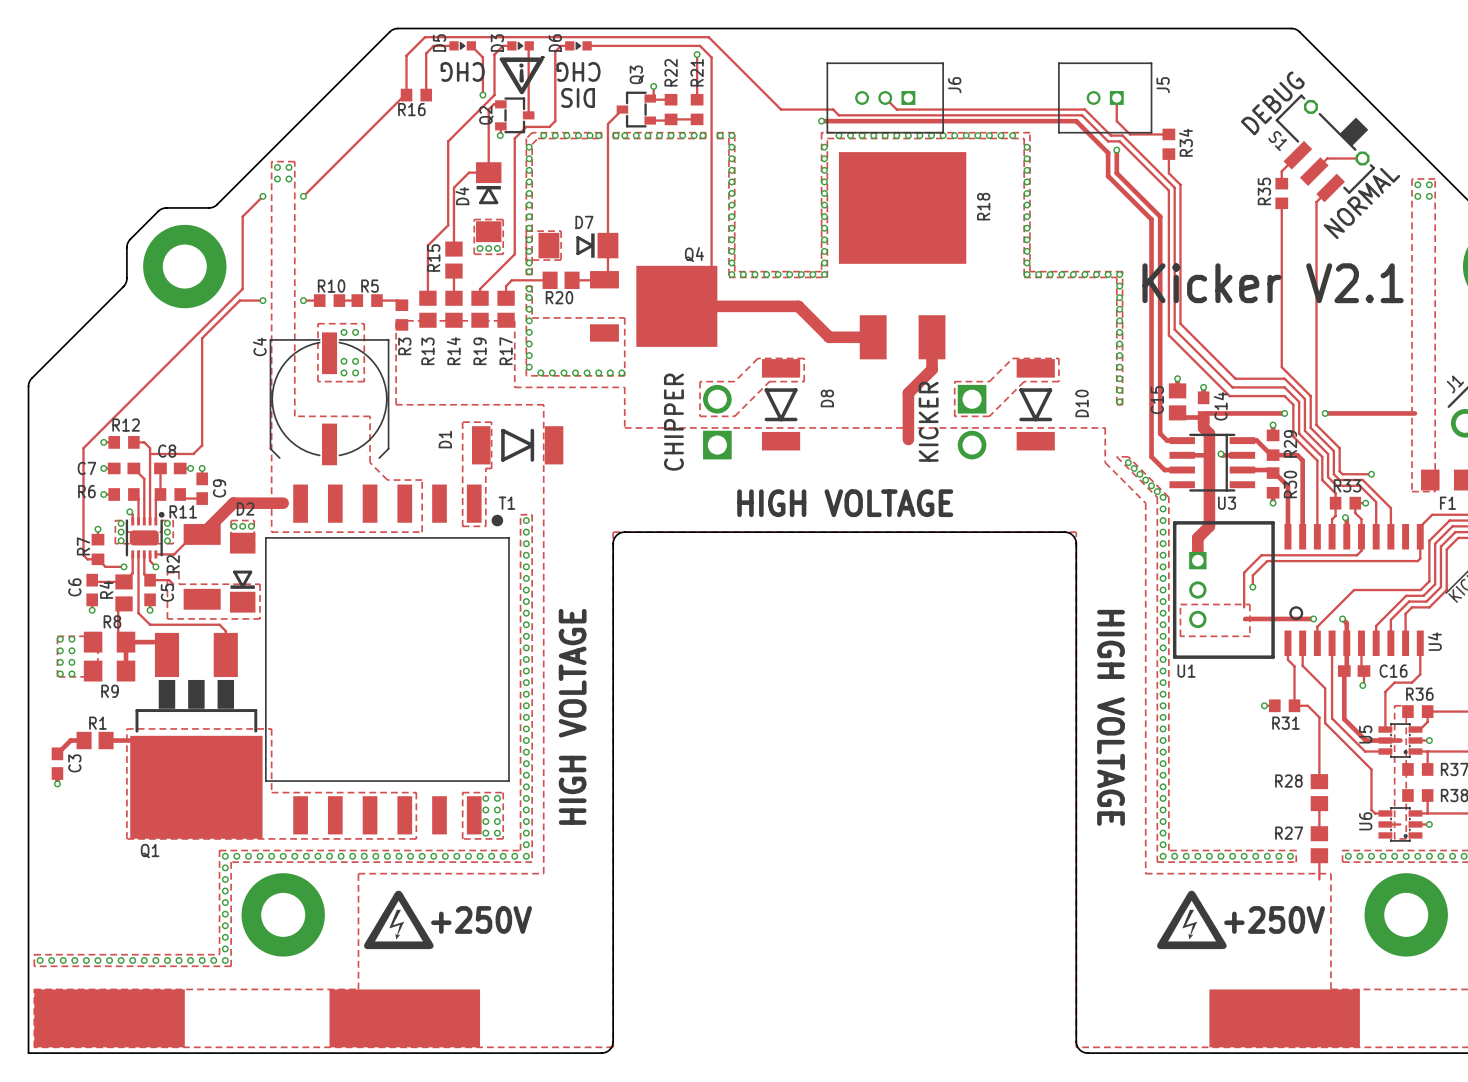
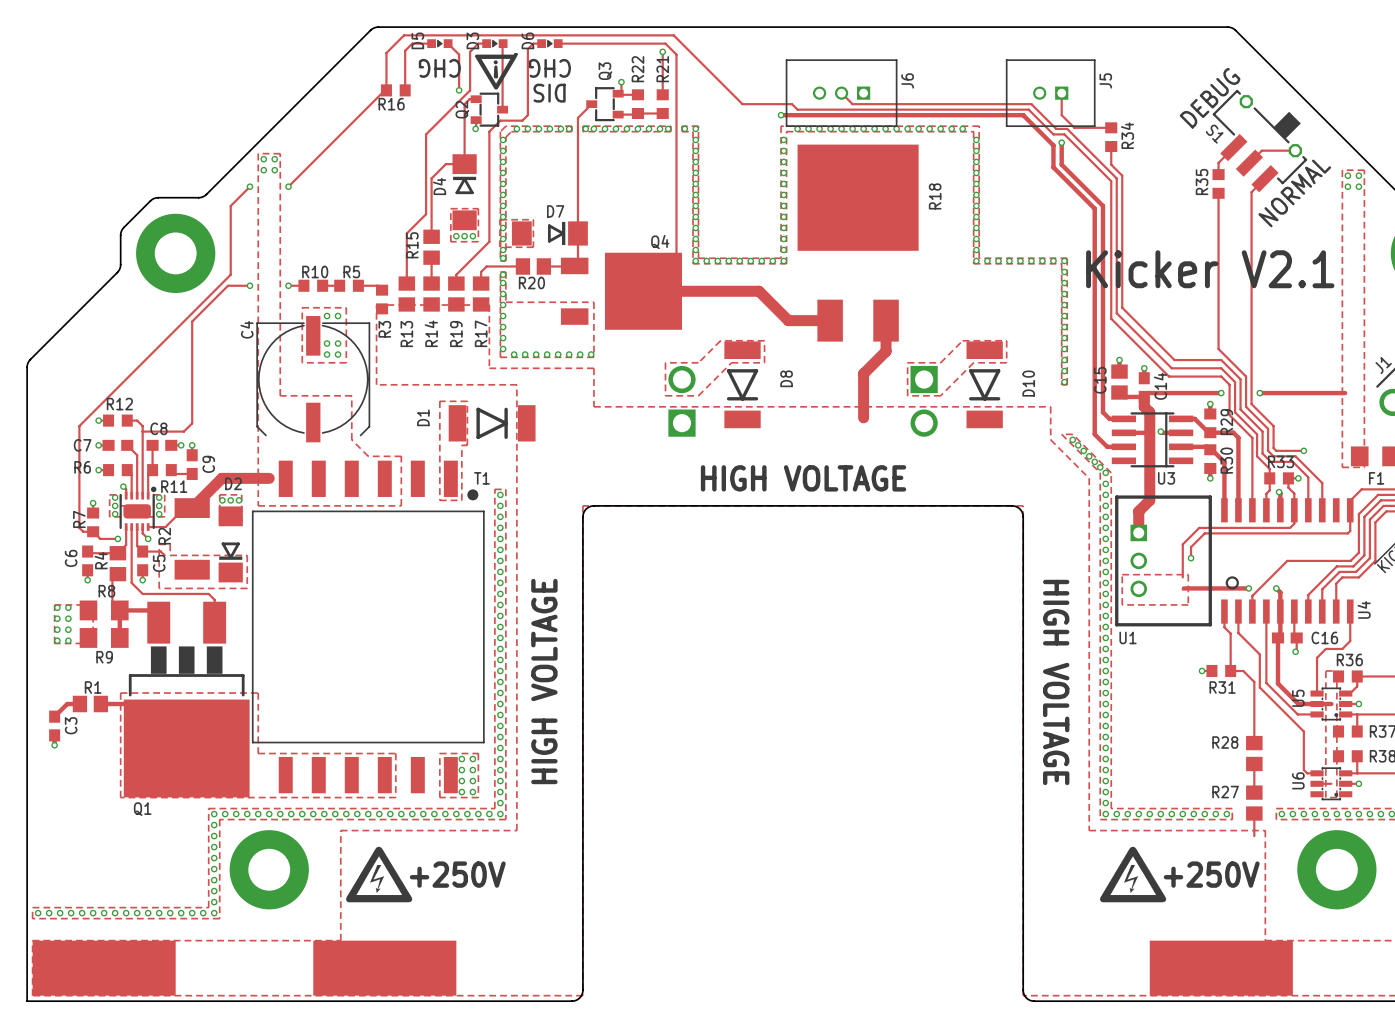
text: KICKER (928, 421) -> none
text: CHIPPER (673, 422) -> none

